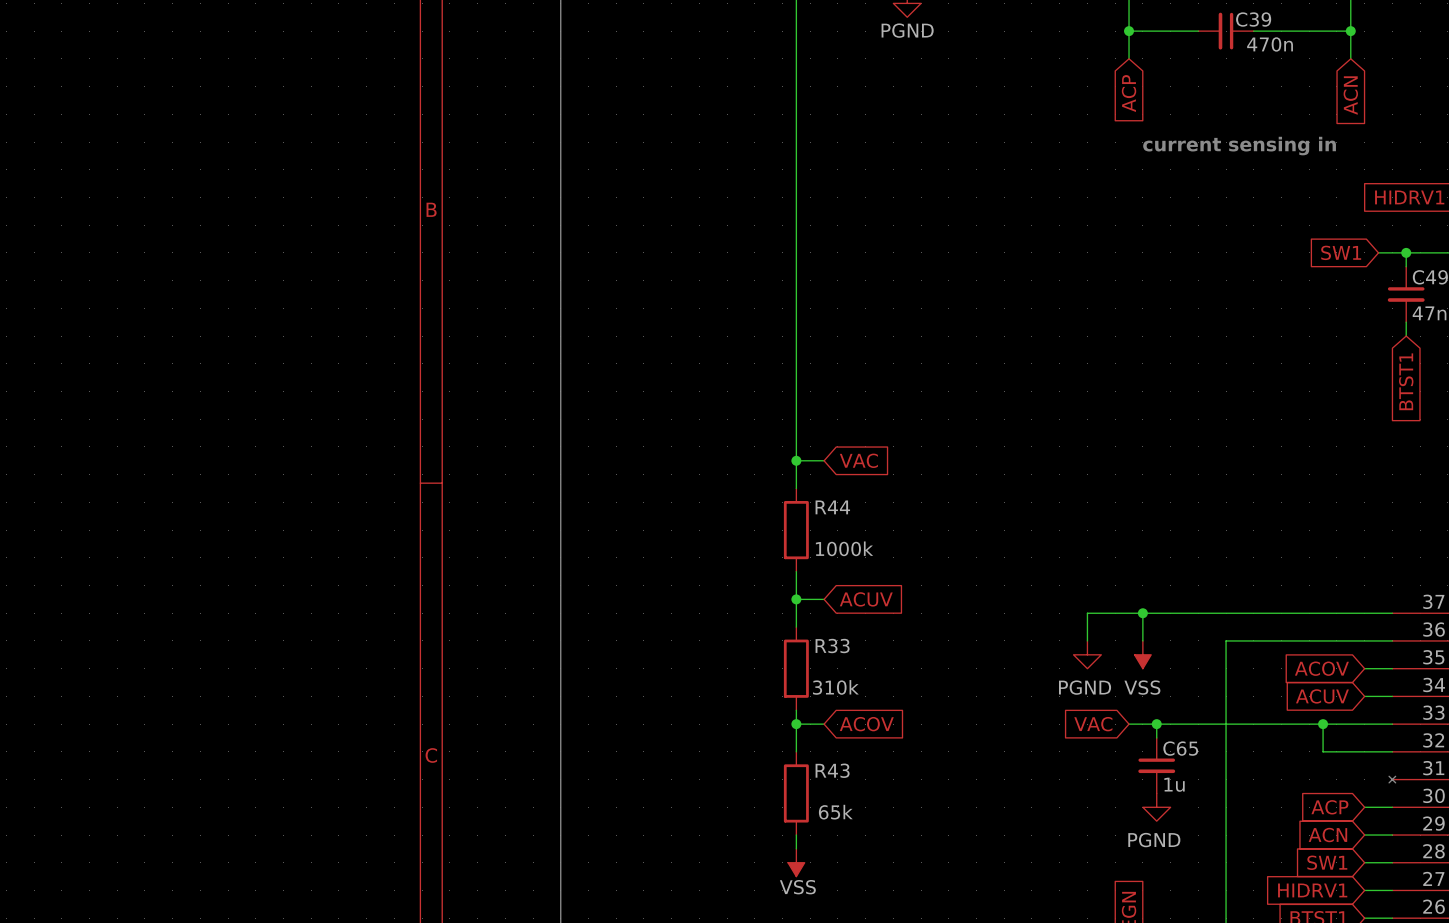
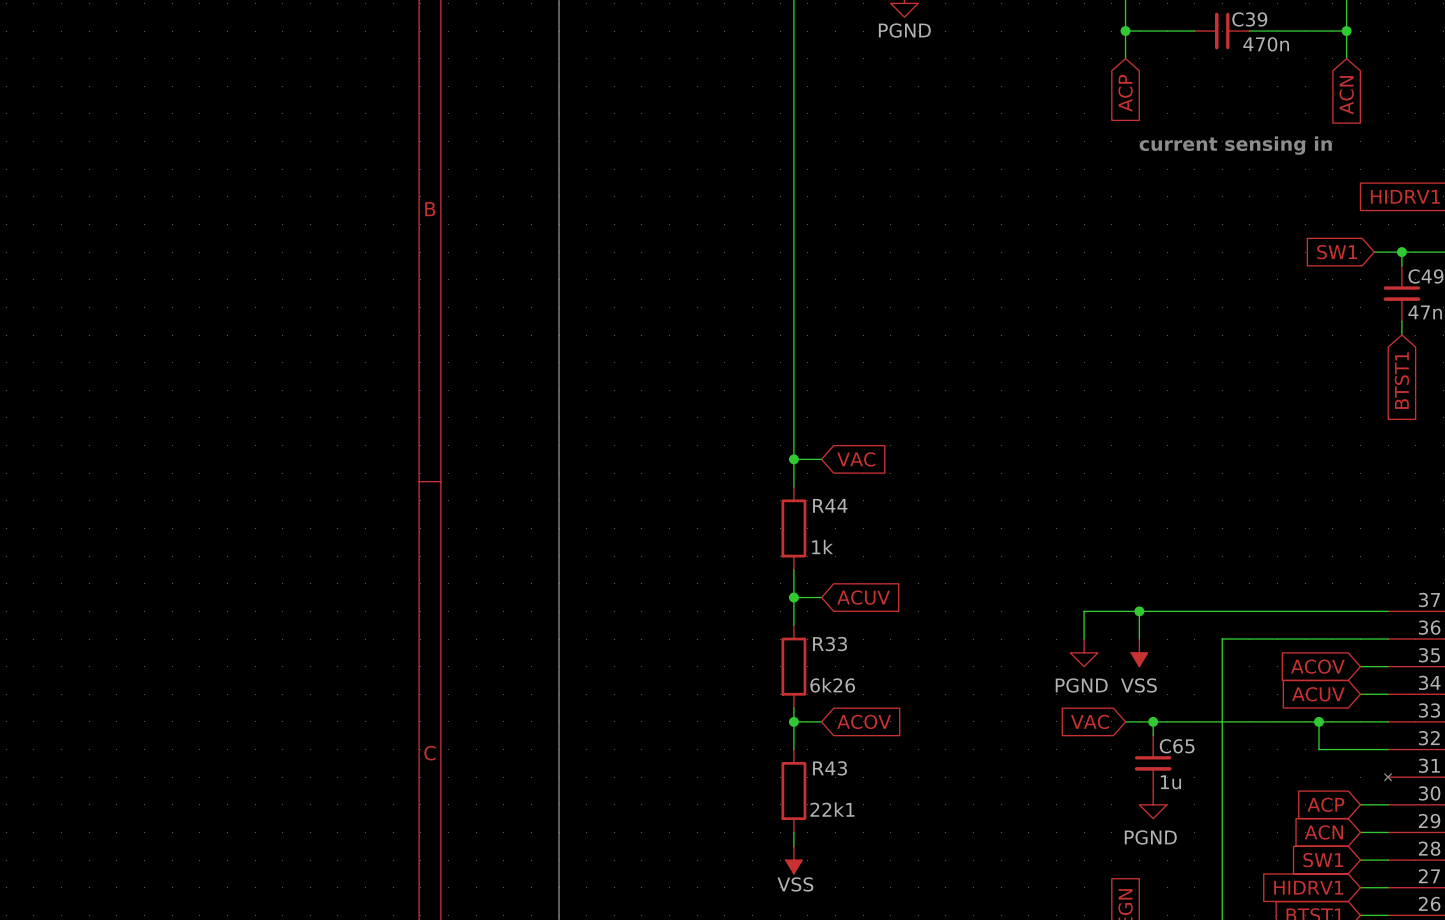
R44 value: 1000k (844, 548) -> 1k (822, 547)
R33 value: 310k (835, 687) -> 6k26 (832, 685)
R43 value: 65k (835, 812) -> 22k1 (832, 809)

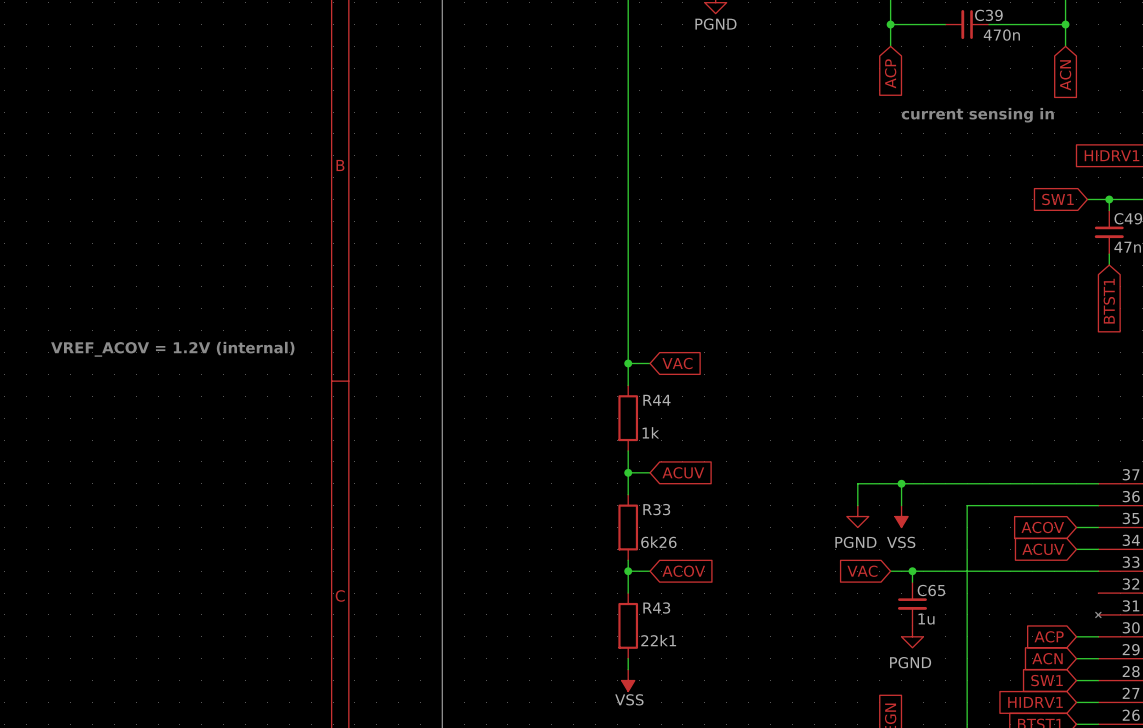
text: none -> VREF_ACOV = 1.2V (internal) (172, 349)
wire: (1319, 721) (1319, 749) (1388, 749) -> none
junction: (1319, 721) -> none

